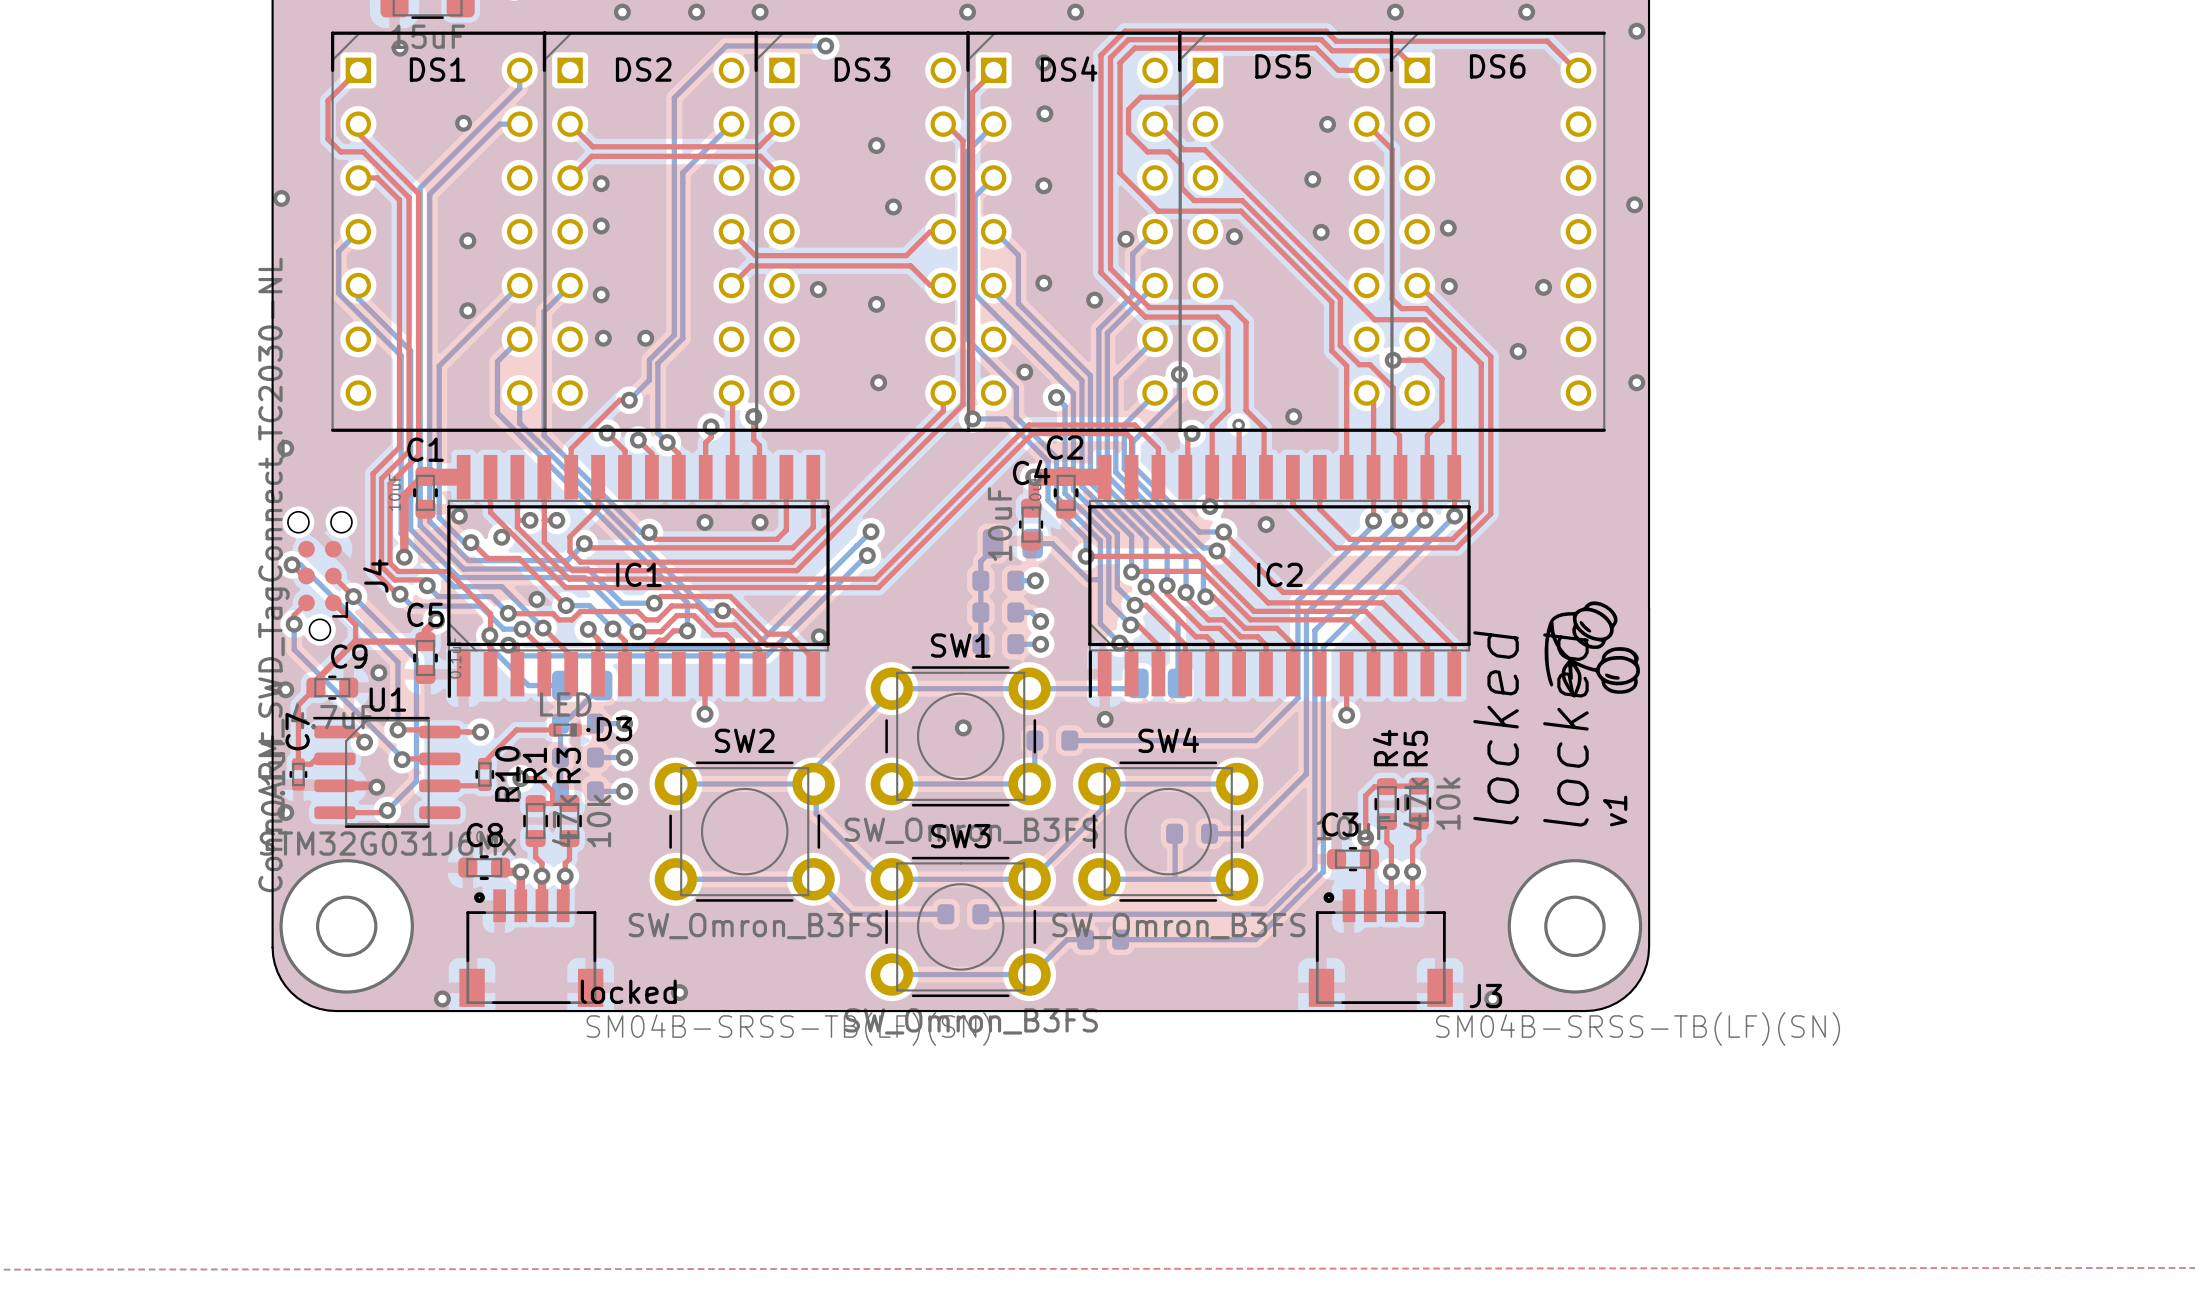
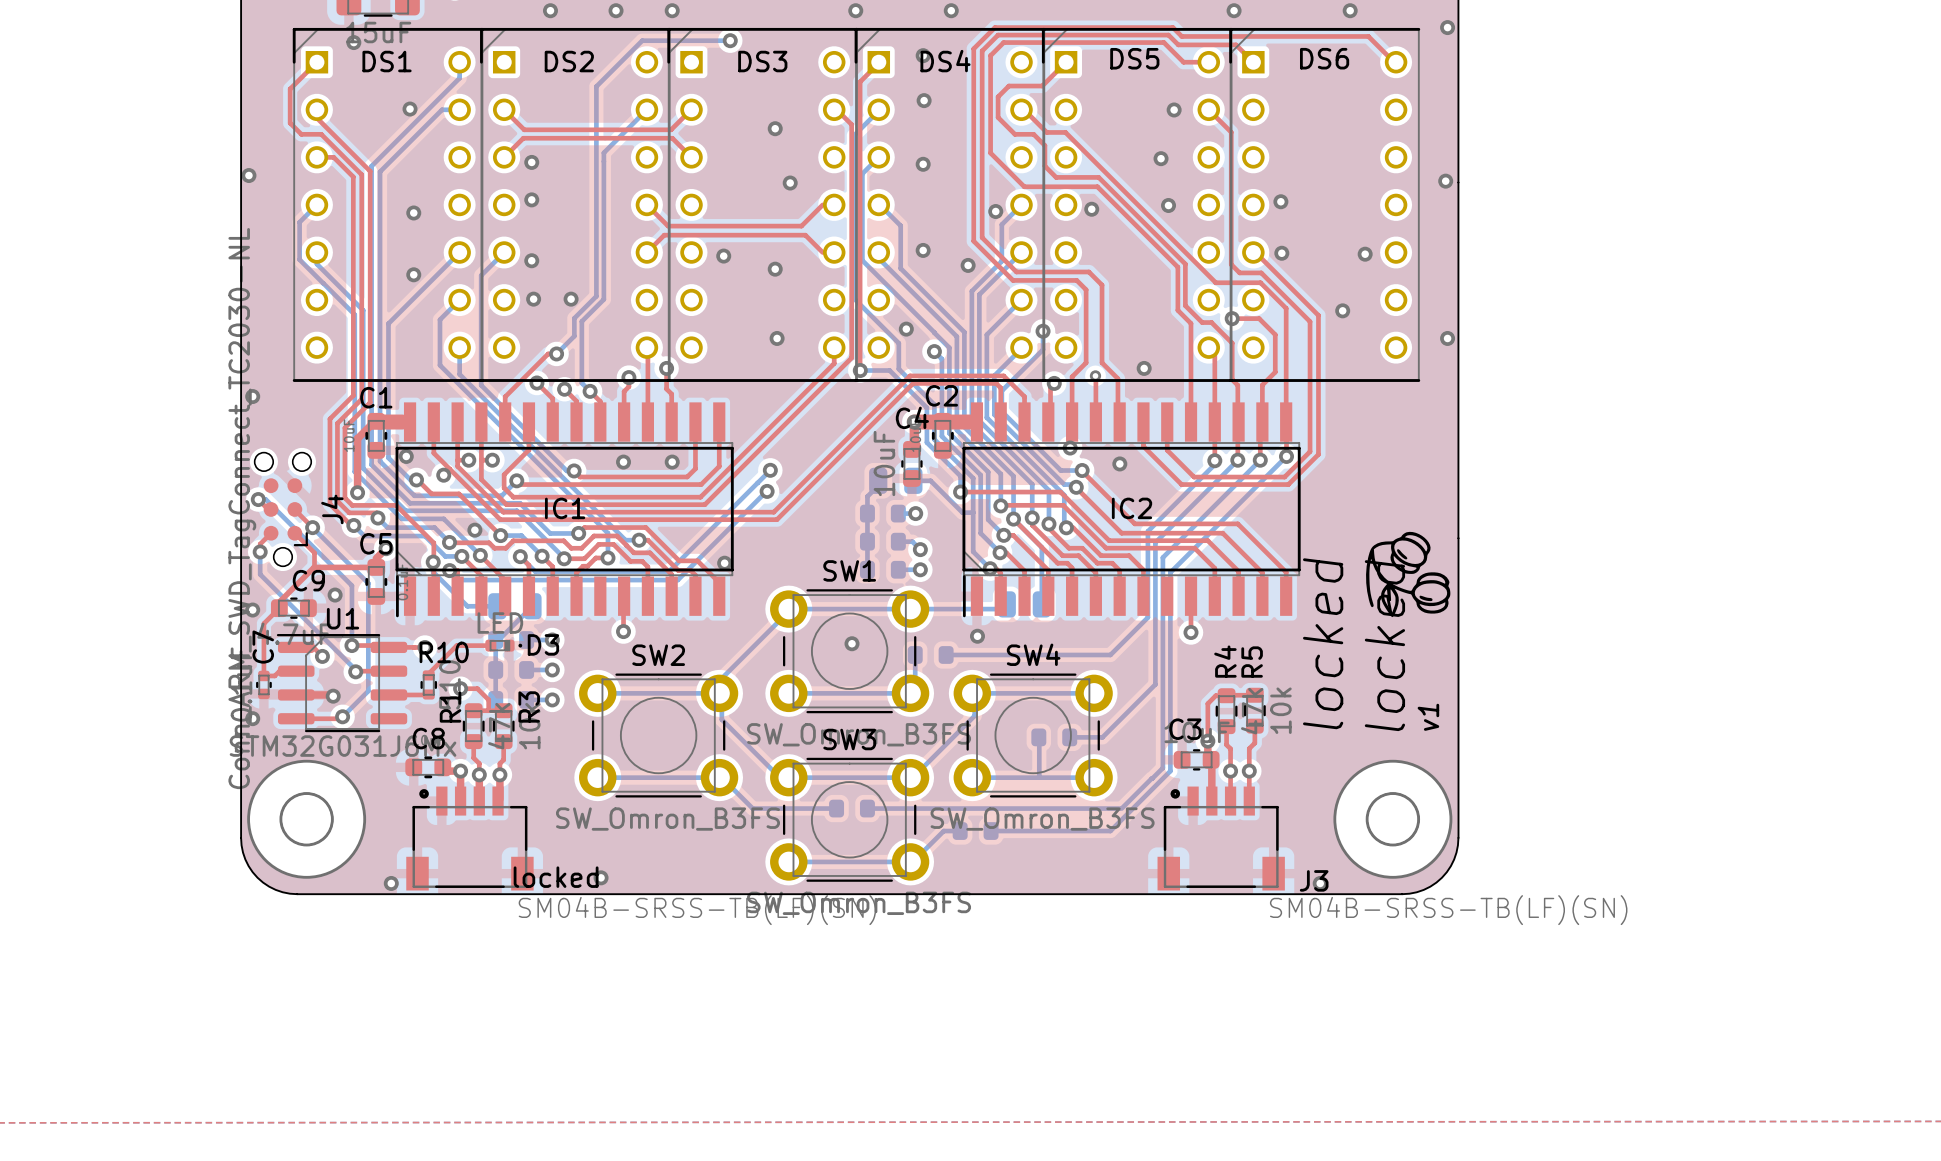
R1 name position: R1 (534, 765) -> R1 (450, 706)
R3 name position: R3 (568, 765) -> R3 (529, 706)
R10 name rotation: 0° (507, 773) -> 90° clockwise (444, 652)

